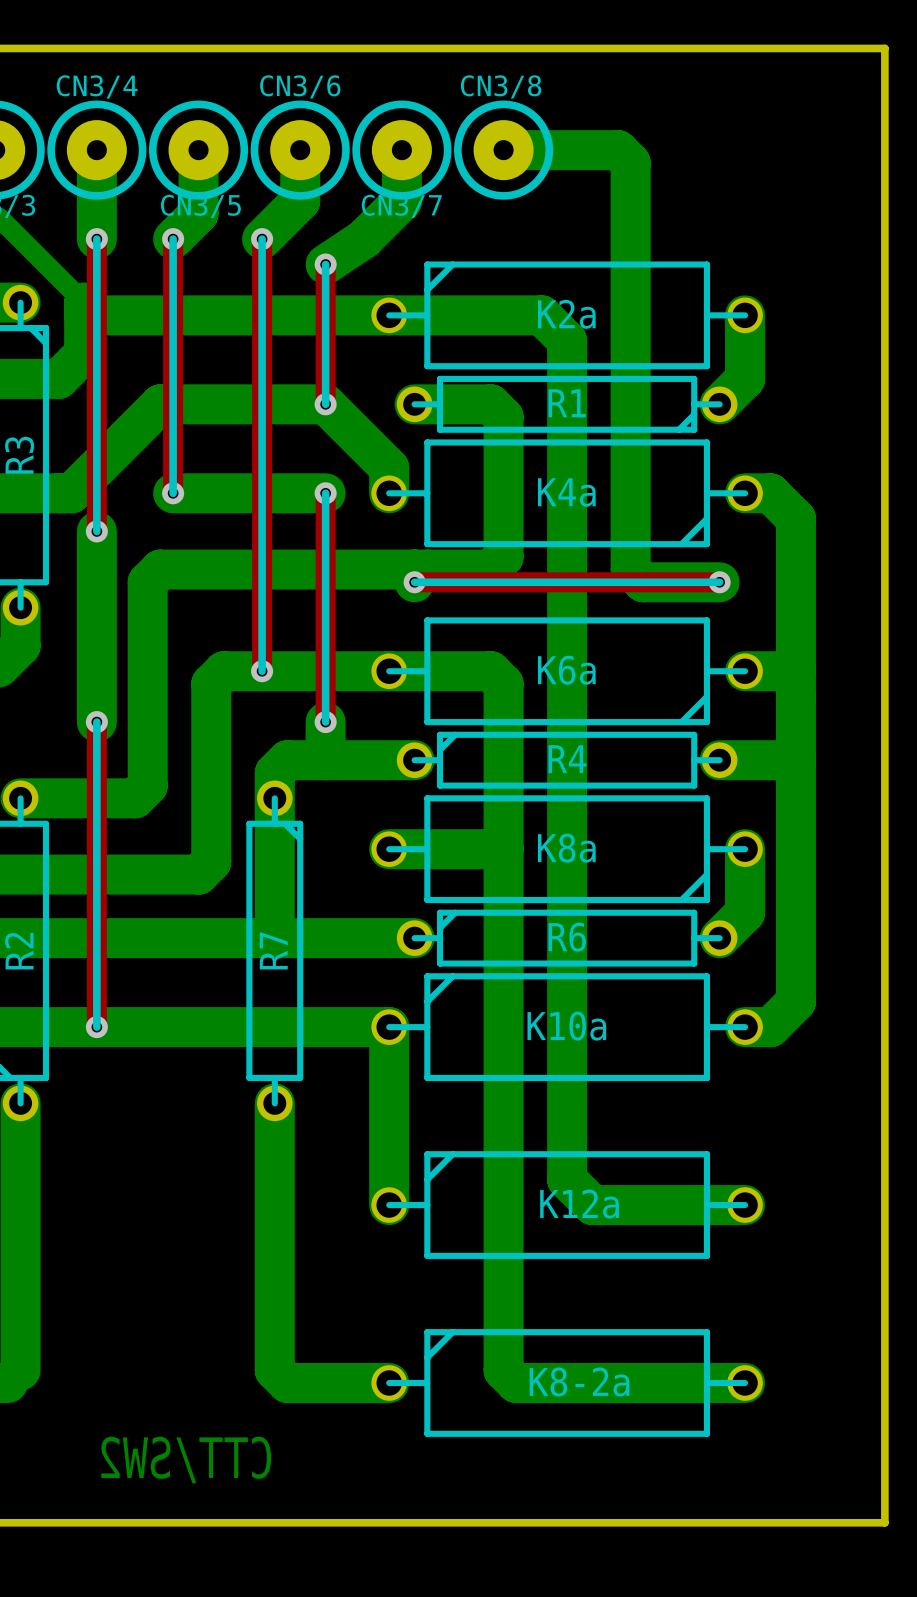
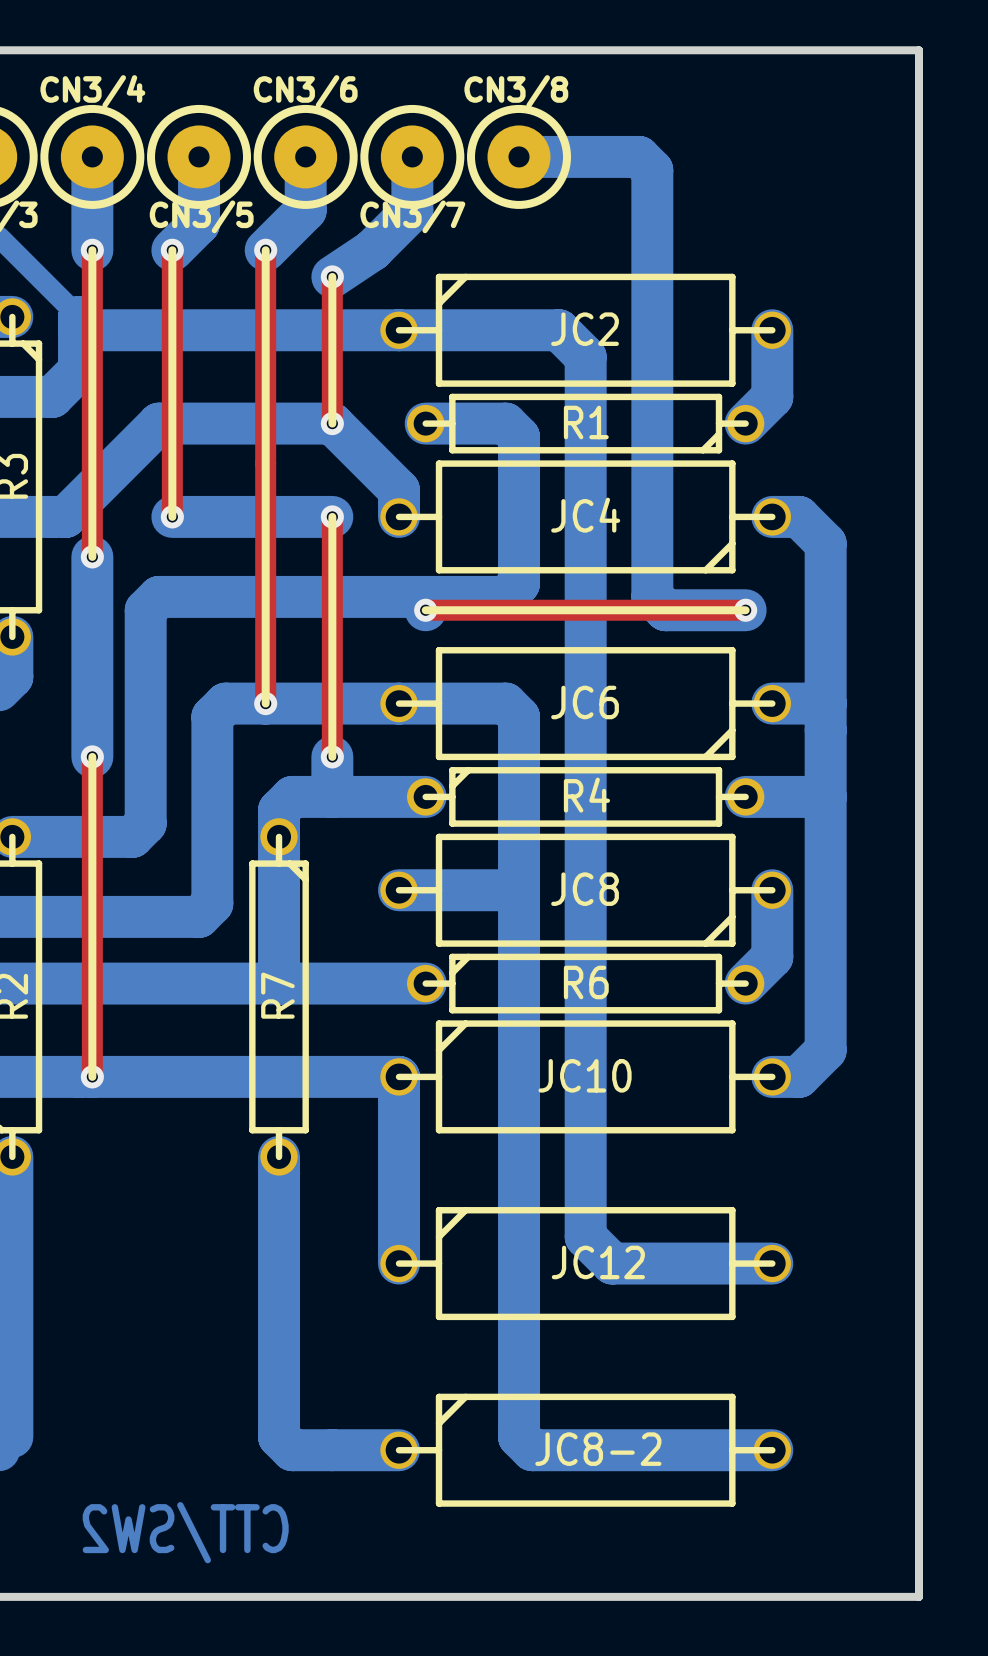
K2a name: K2a (566, 314) -> JC2 (585, 329)
K4a name: K4a (566, 492) -> JC4 (585, 515)
K6a name: K6a (566, 670) -> JC6 (585, 702)
K8a name: K8a (566, 848) -> JC8 (585, 889)
K10a name: K10a (566, 1026) -> JC10 (585, 1075)
K12a name: K12a (579, 1204) -> JC12 (598, 1262)
K8-2a name: K8-2a (579, 1381) -> JC8-2 (598, 1449)

